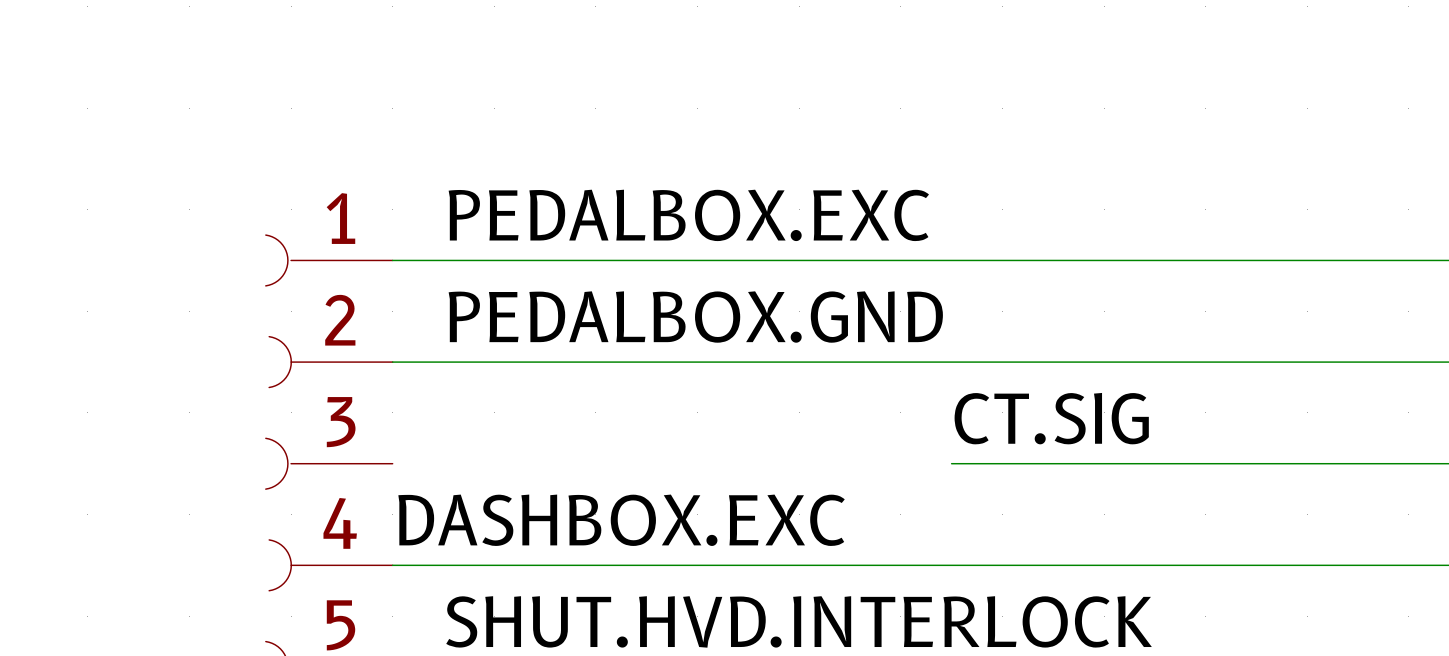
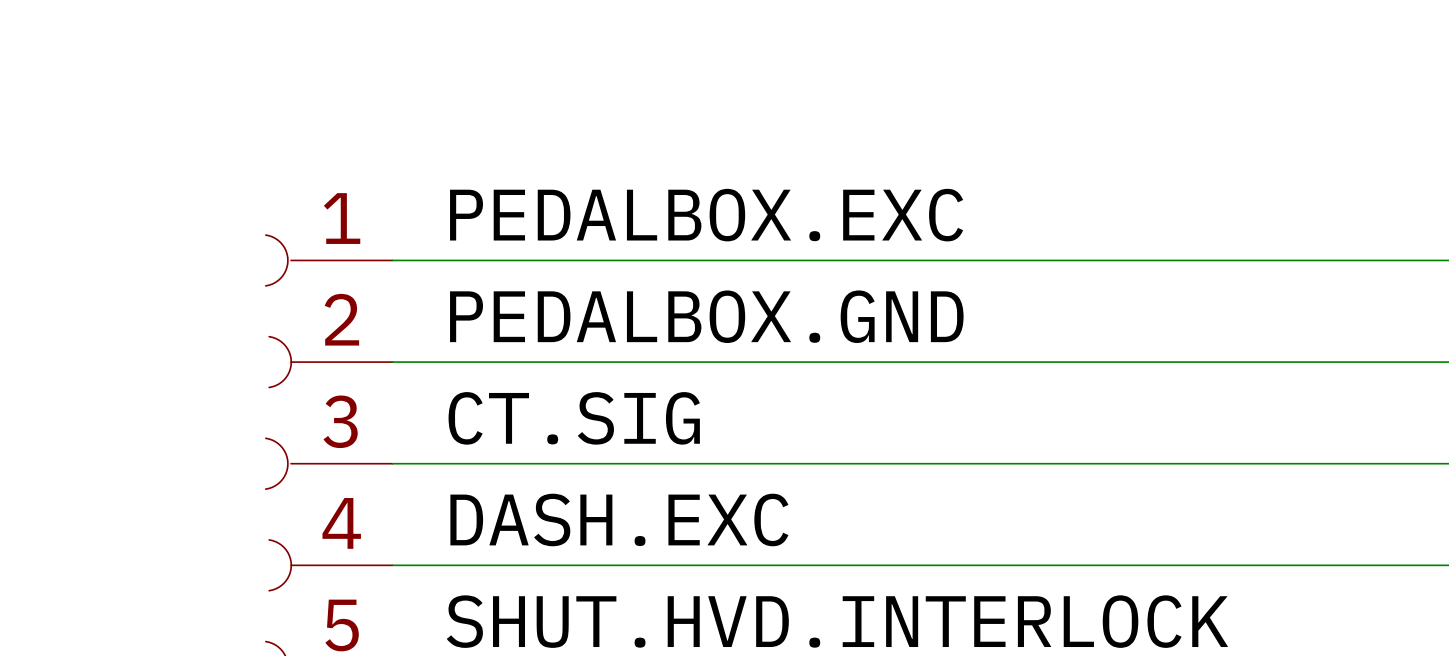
label position: CT.SIG (1051, 418) -> CT.SIG (574, 418)
wire: none -> (392, 463) (951, 463)
label: DASHBOX.EXC (621, 520) -> DASH.EXC (619, 519)

